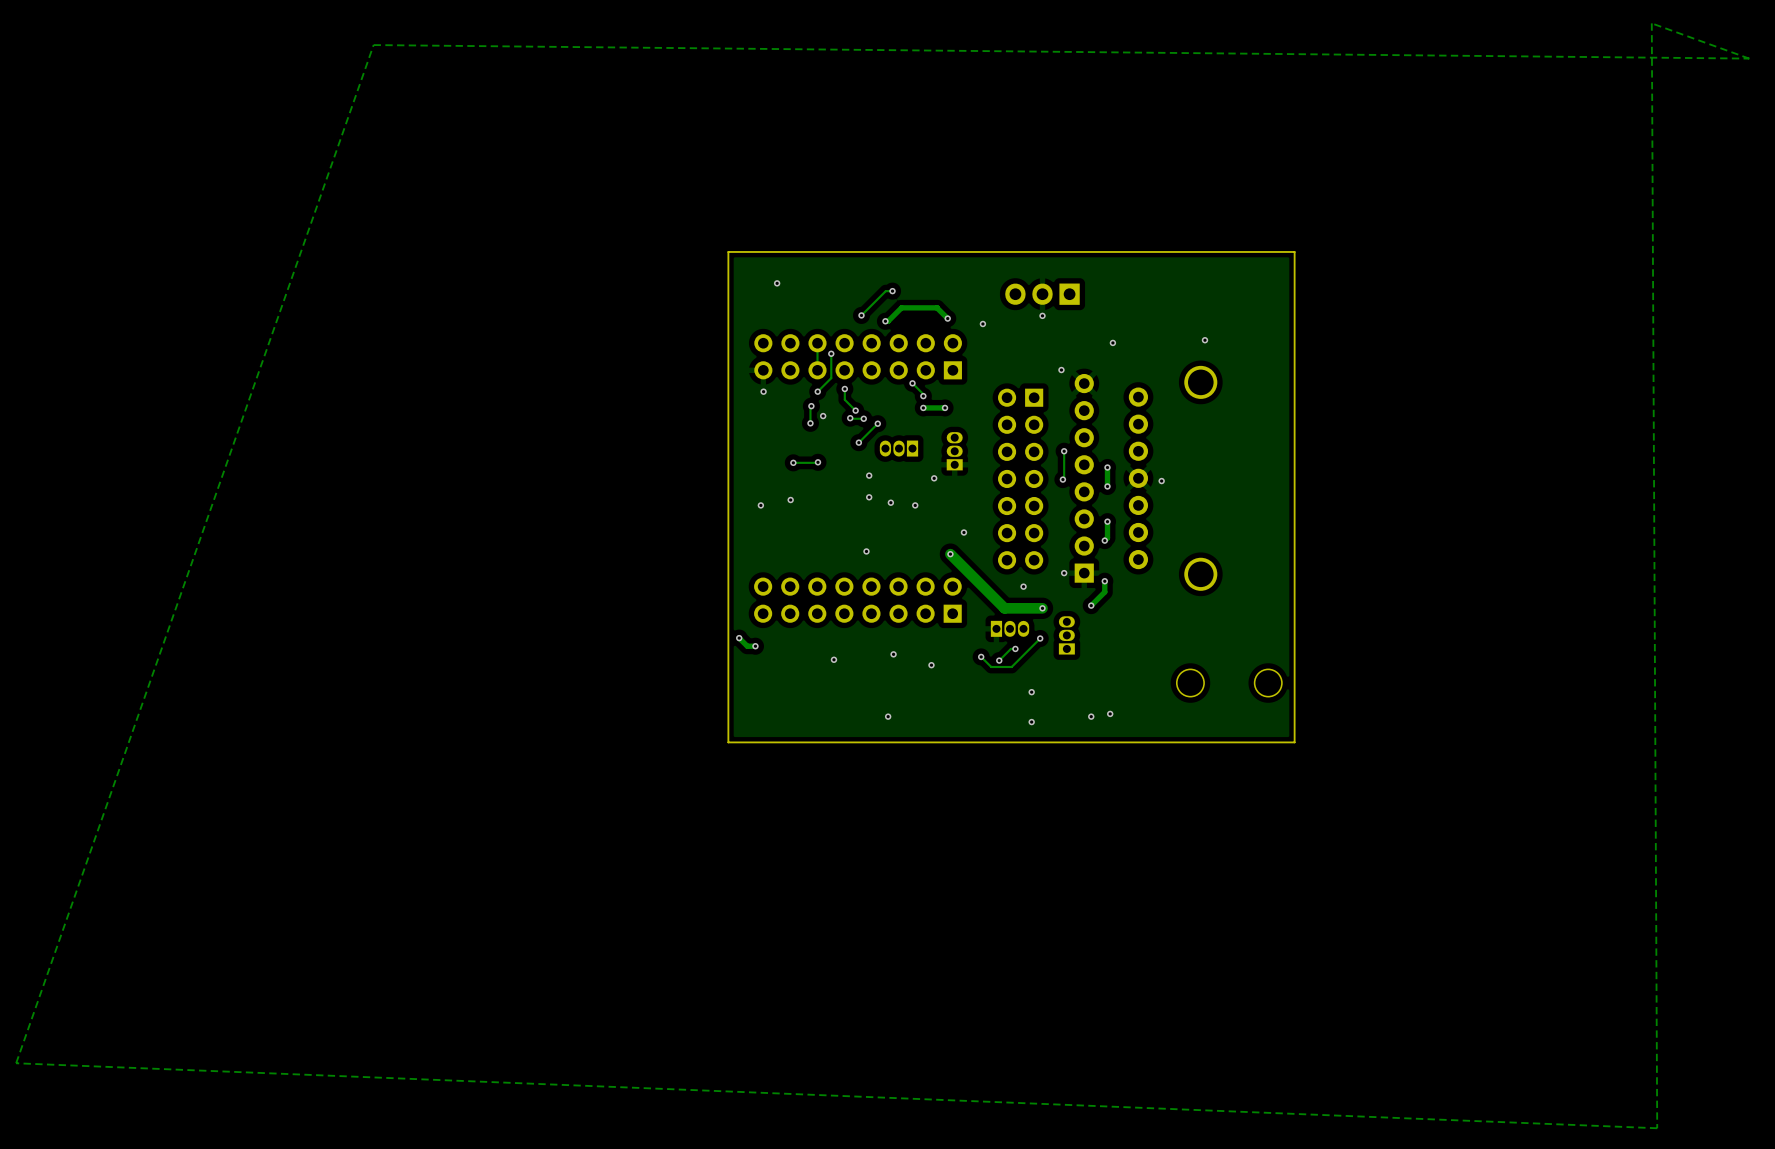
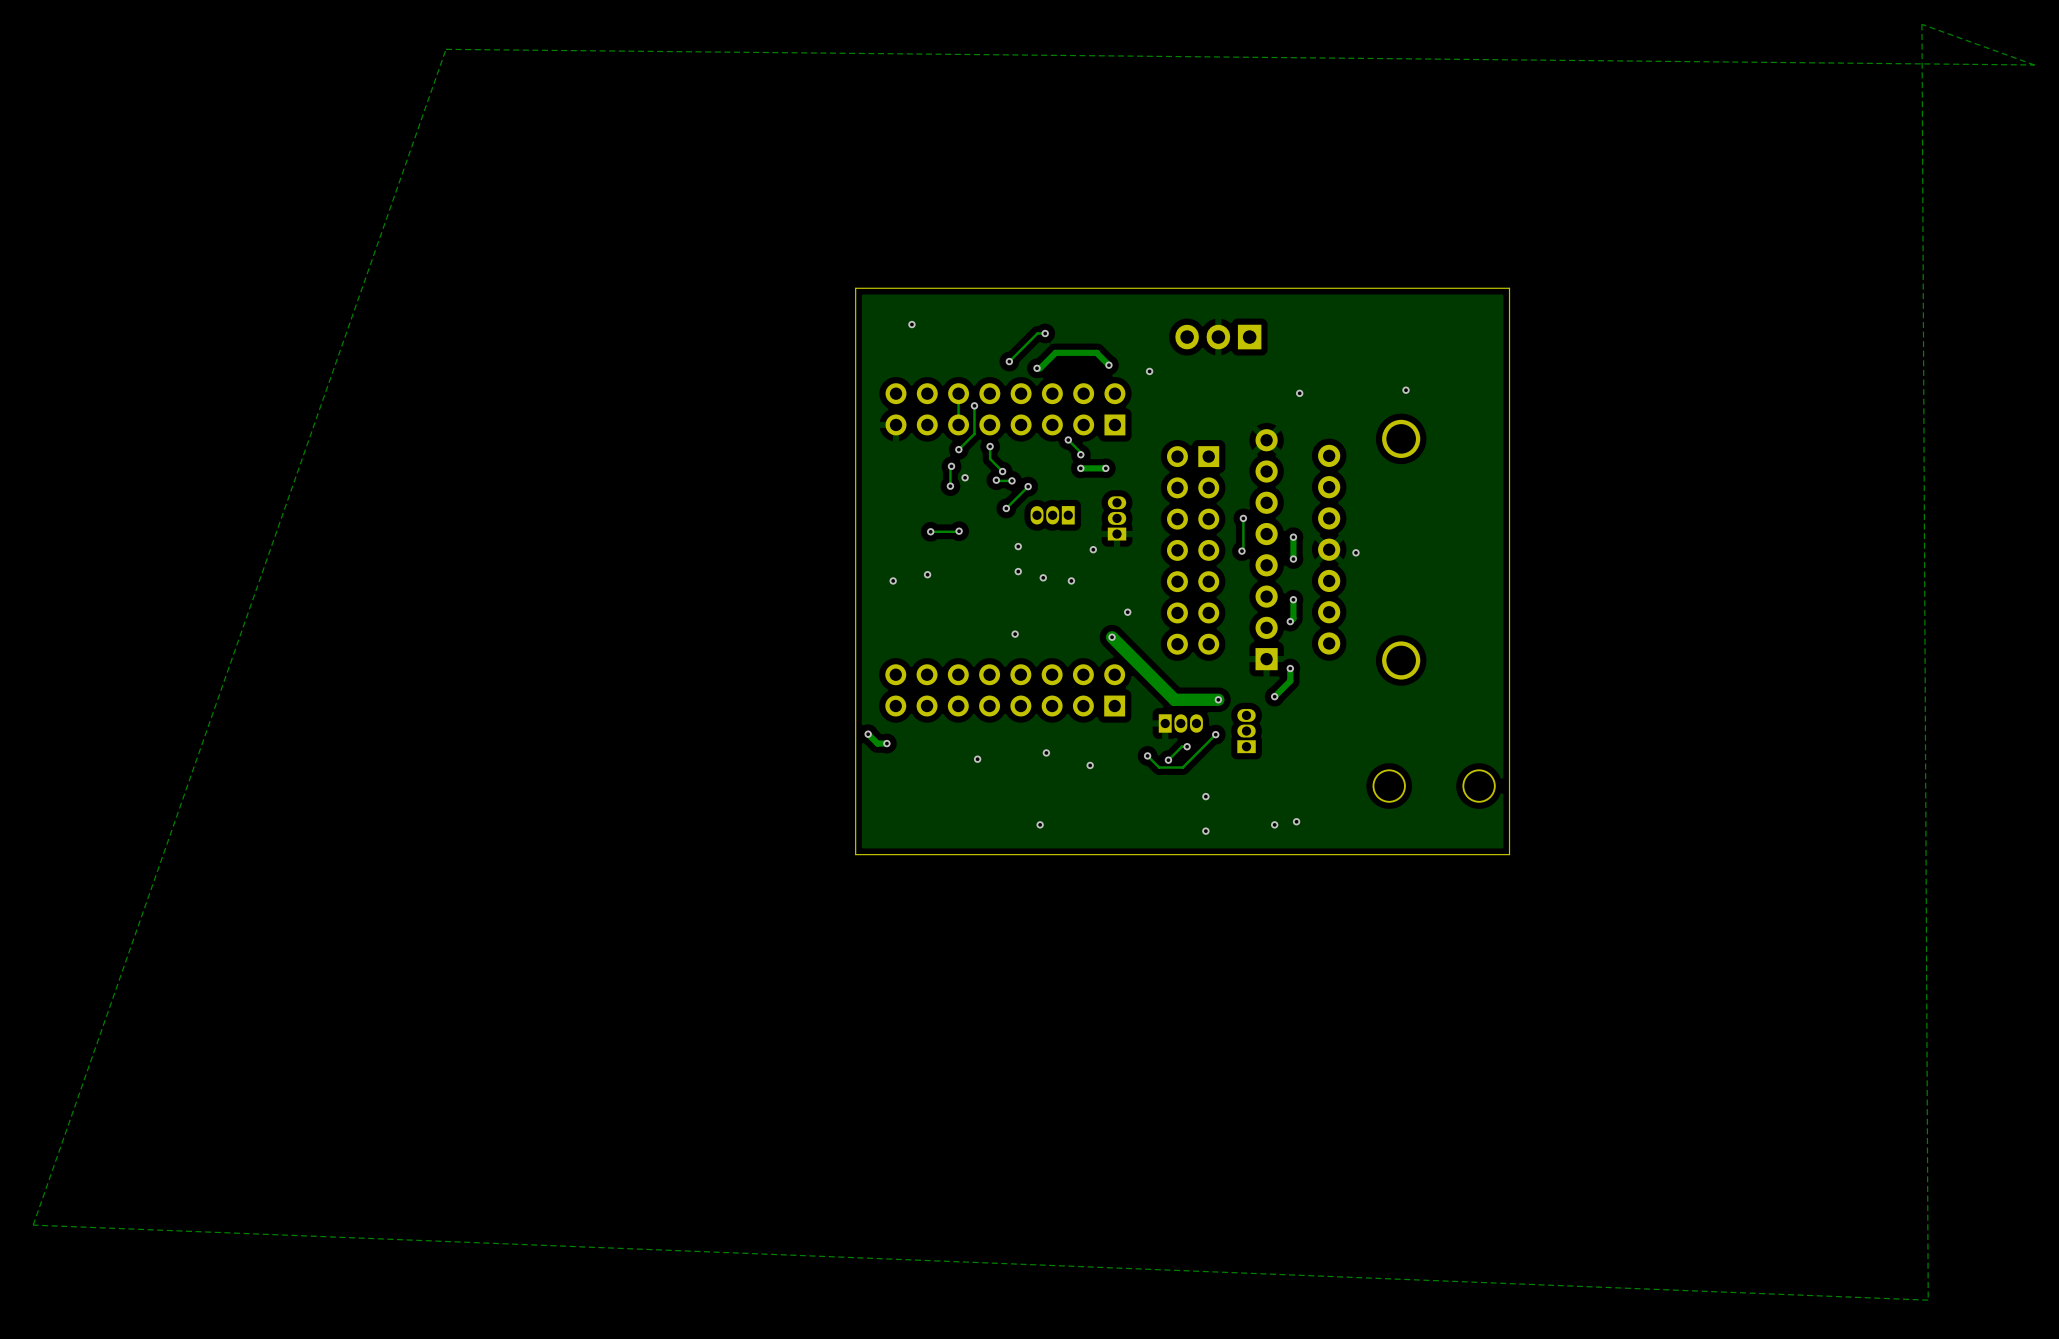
via: (1042, 315) -> none
via: (1061, 370) -> none
via: (763, 391) -> none
via: (1064, 573) -> none
via: (1023, 586) -> none

